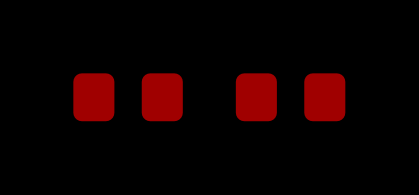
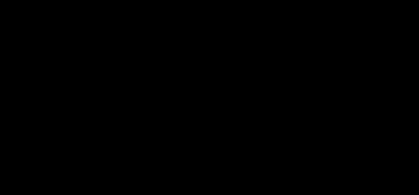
part: (128, 97) -> none
part: (290, 97) -> none

